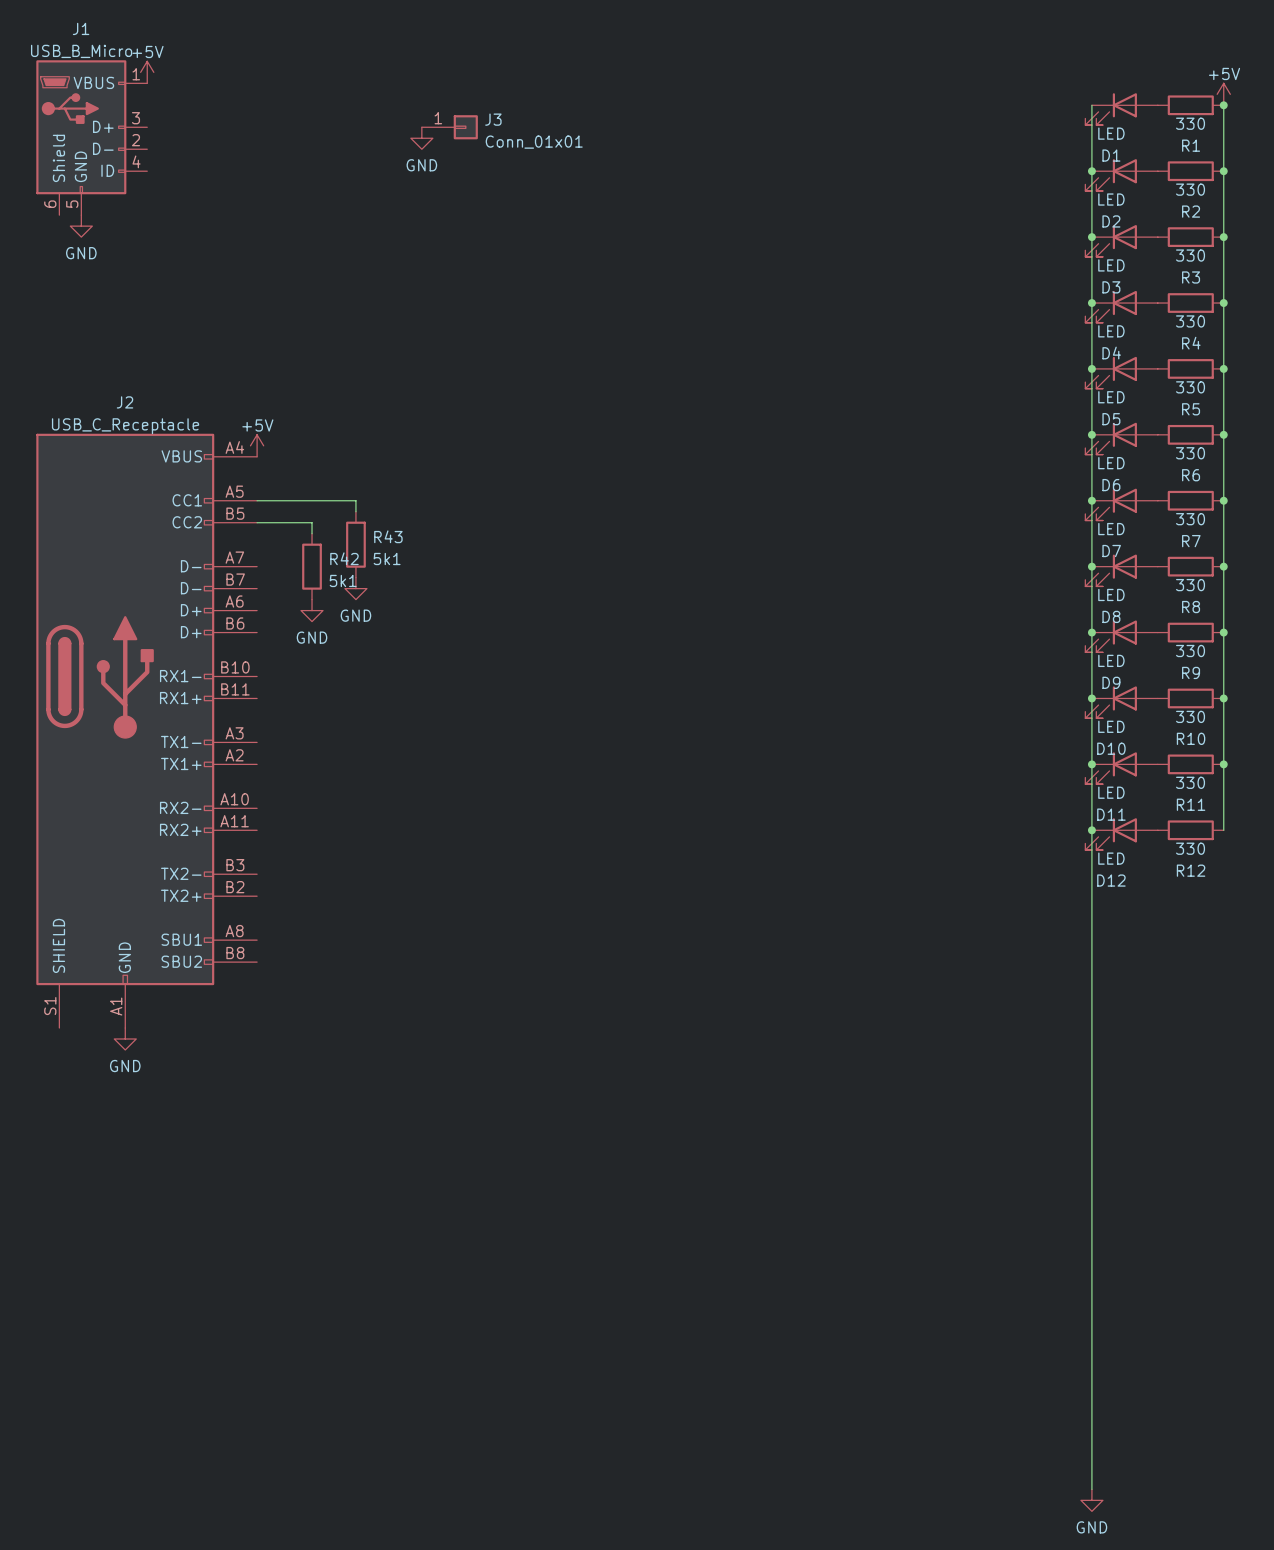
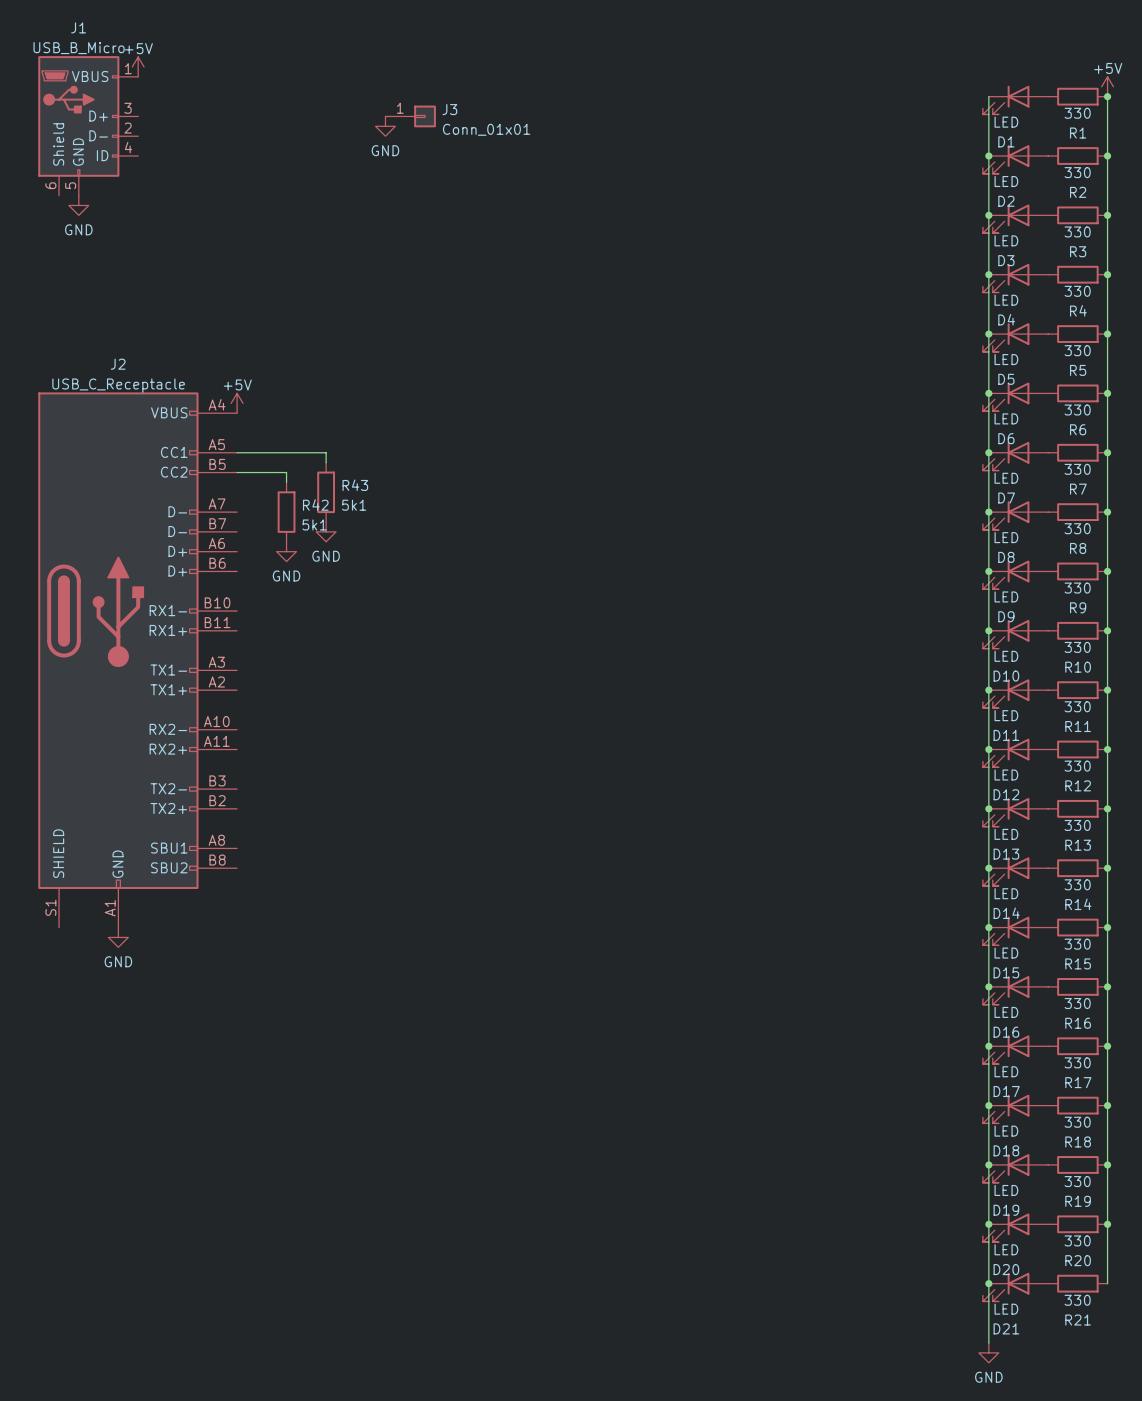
wire: none -> (1107, 749) (1107, 1283)
junction: none -> (1107, 749)
junction: none -> (988, 808)
R13: none -> 330 (1077, 808)
junction: none -> (1107, 808)
D13: none -> LED (1015, 812)
junction: none -> (988, 868)
R14: none -> 330 (1077, 868)
junction: none -> (1107, 868)
D14: none -> LED (1015, 871)
junction: none -> (988, 927)
R15: none -> 330 (1077, 927)
junction: none -> (1107, 927)
D15: none -> LED (1015, 931)
junction: none -> (988, 986)
R16: none -> 330 (1077, 986)
junction: none -> (1107, 986)
D16: none -> LED (1015, 990)
junction: none -> (988, 1046)
R17: none -> 330 (1077, 1046)
junction: none -> (1107, 1046)
D17: none -> LED (1015, 1049)
junction: none -> (988, 1105)
R18: none -> 330 (1077, 1105)
junction: none -> (1107, 1105)
D18: none -> LED (1015, 1109)
junction: none -> (988, 1164)
R19: none -> 330 (1077, 1164)
junction: none -> (1107, 1164)
D19: none -> LED (1015, 1168)
junction: none -> (988, 1224)
R20: none -> 330 (1077, 1224)
junction: none -> (1107, 1224)
D20: none -> LED (1015, 1227)
junction: none -> (988, 1283)
R21: none -> 330 (1077, 1283)
D21: none -> LED (1015, 1287)

